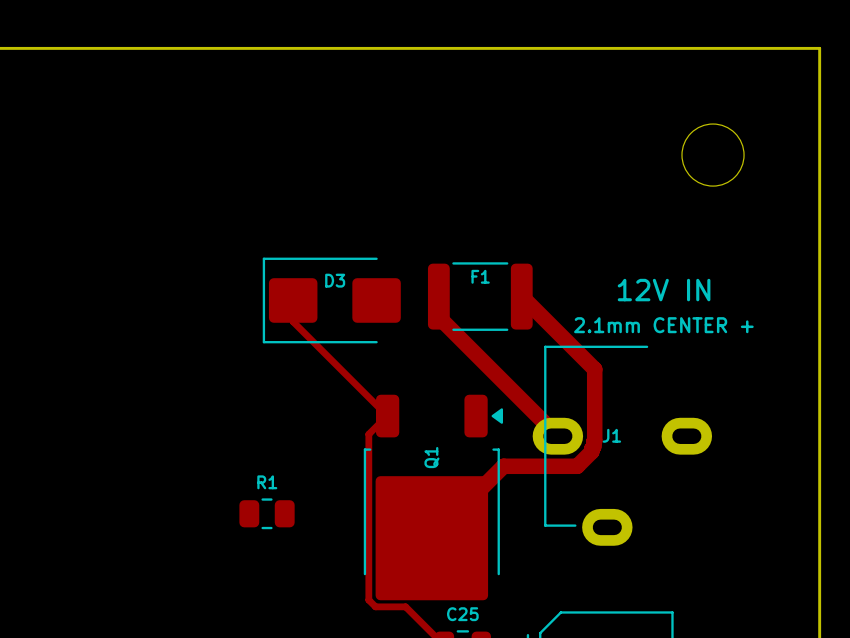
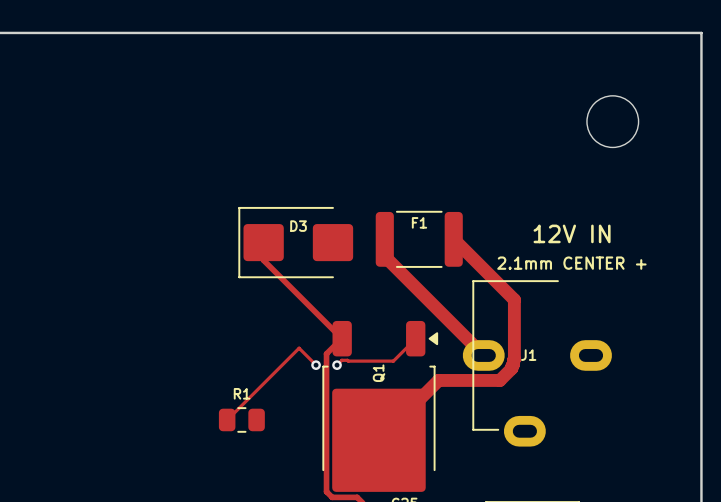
track: none -> (415, 338) (393, 361) (341, 360) (337, 365)
track: none -> (316, 365) (299, 348) (227, 419)
via: none -> (316, 365)
via: none -> (337, 365)

